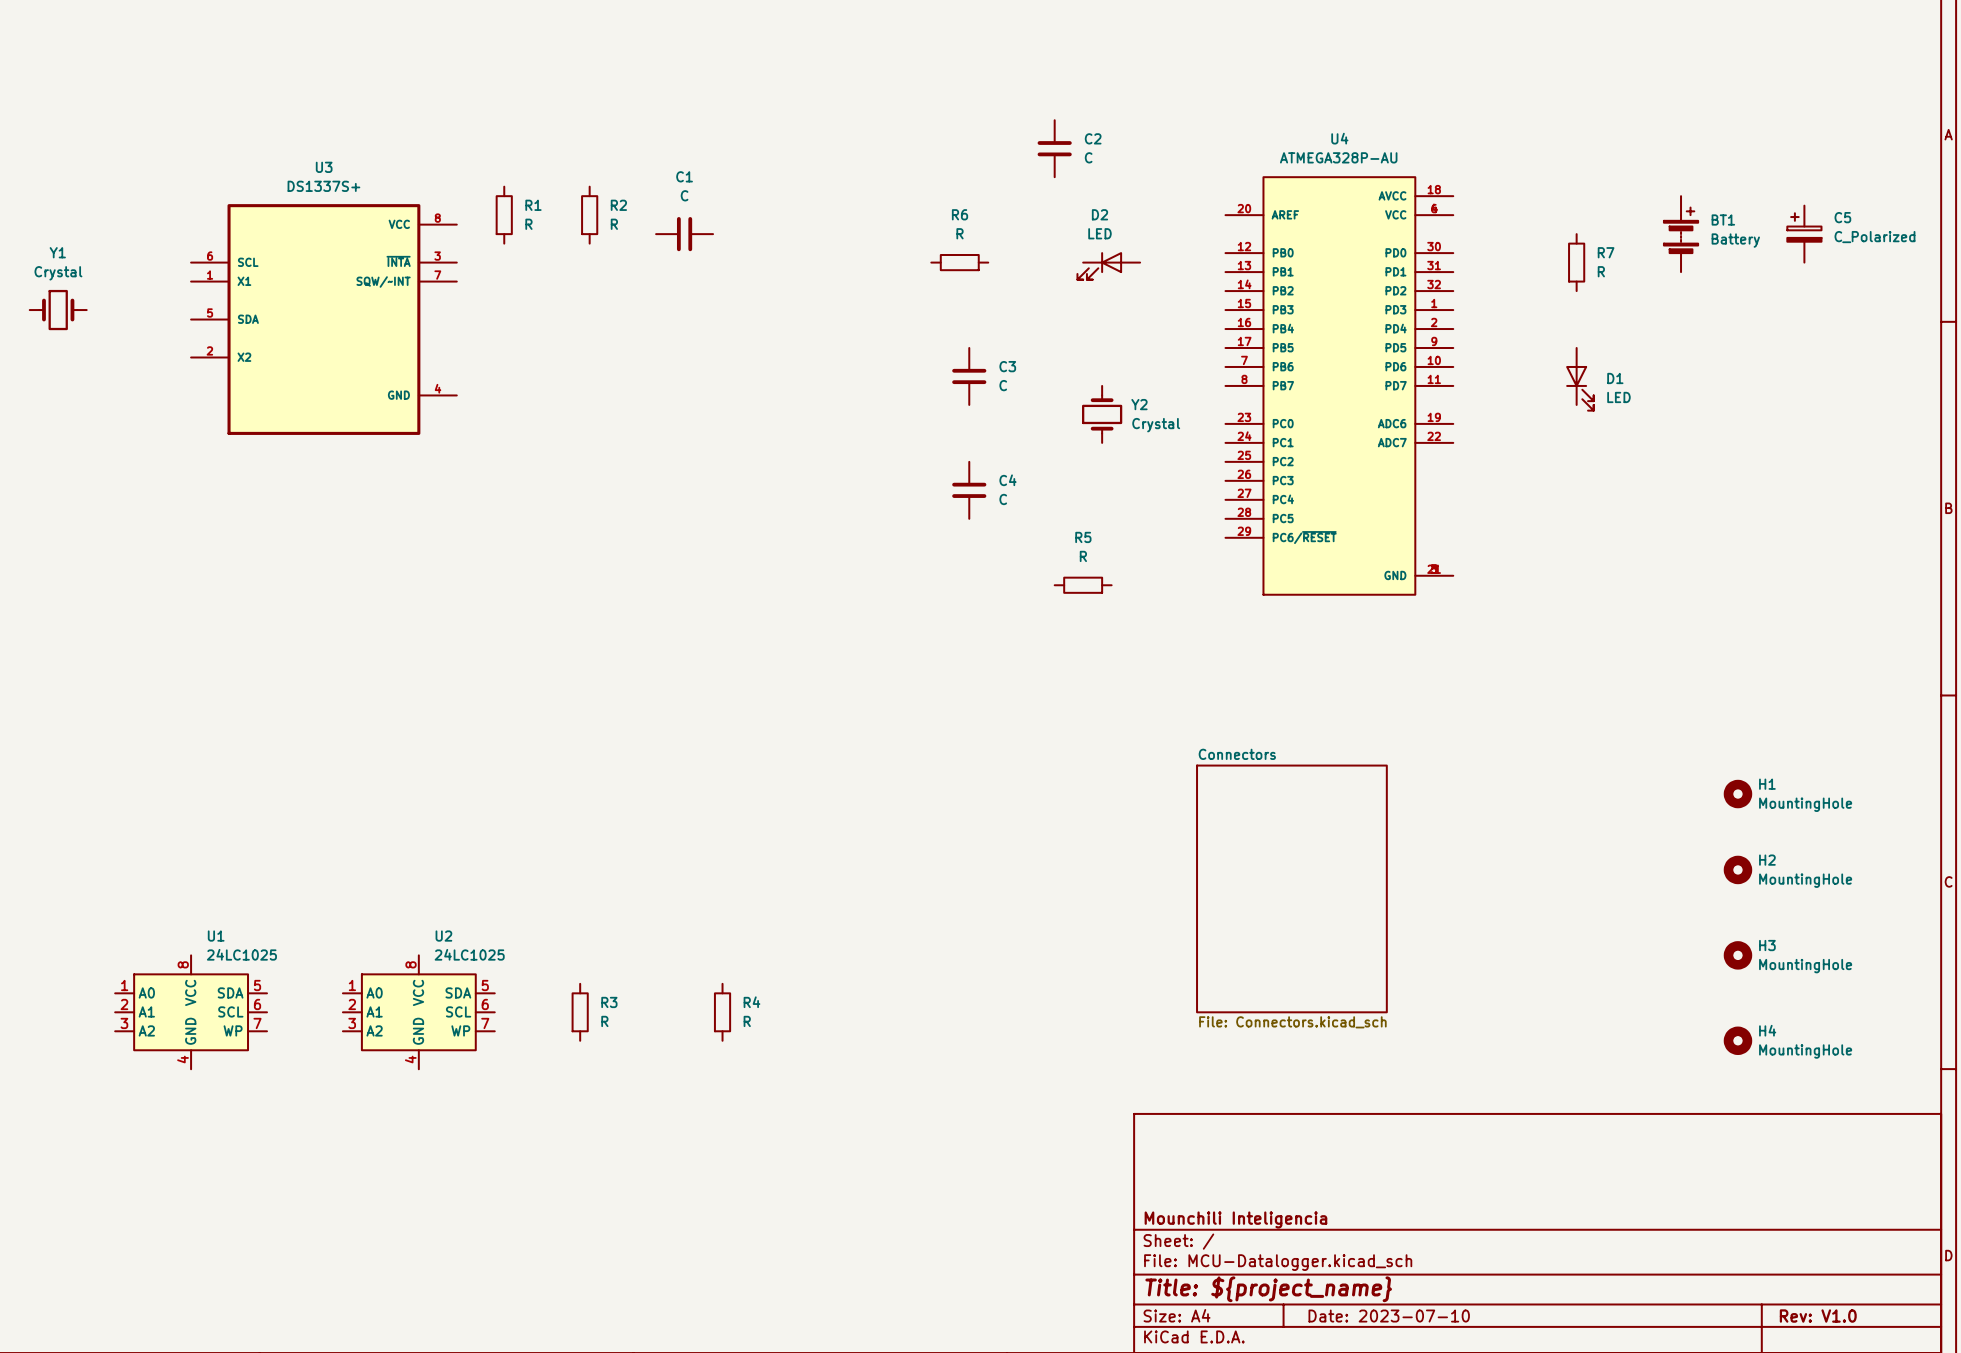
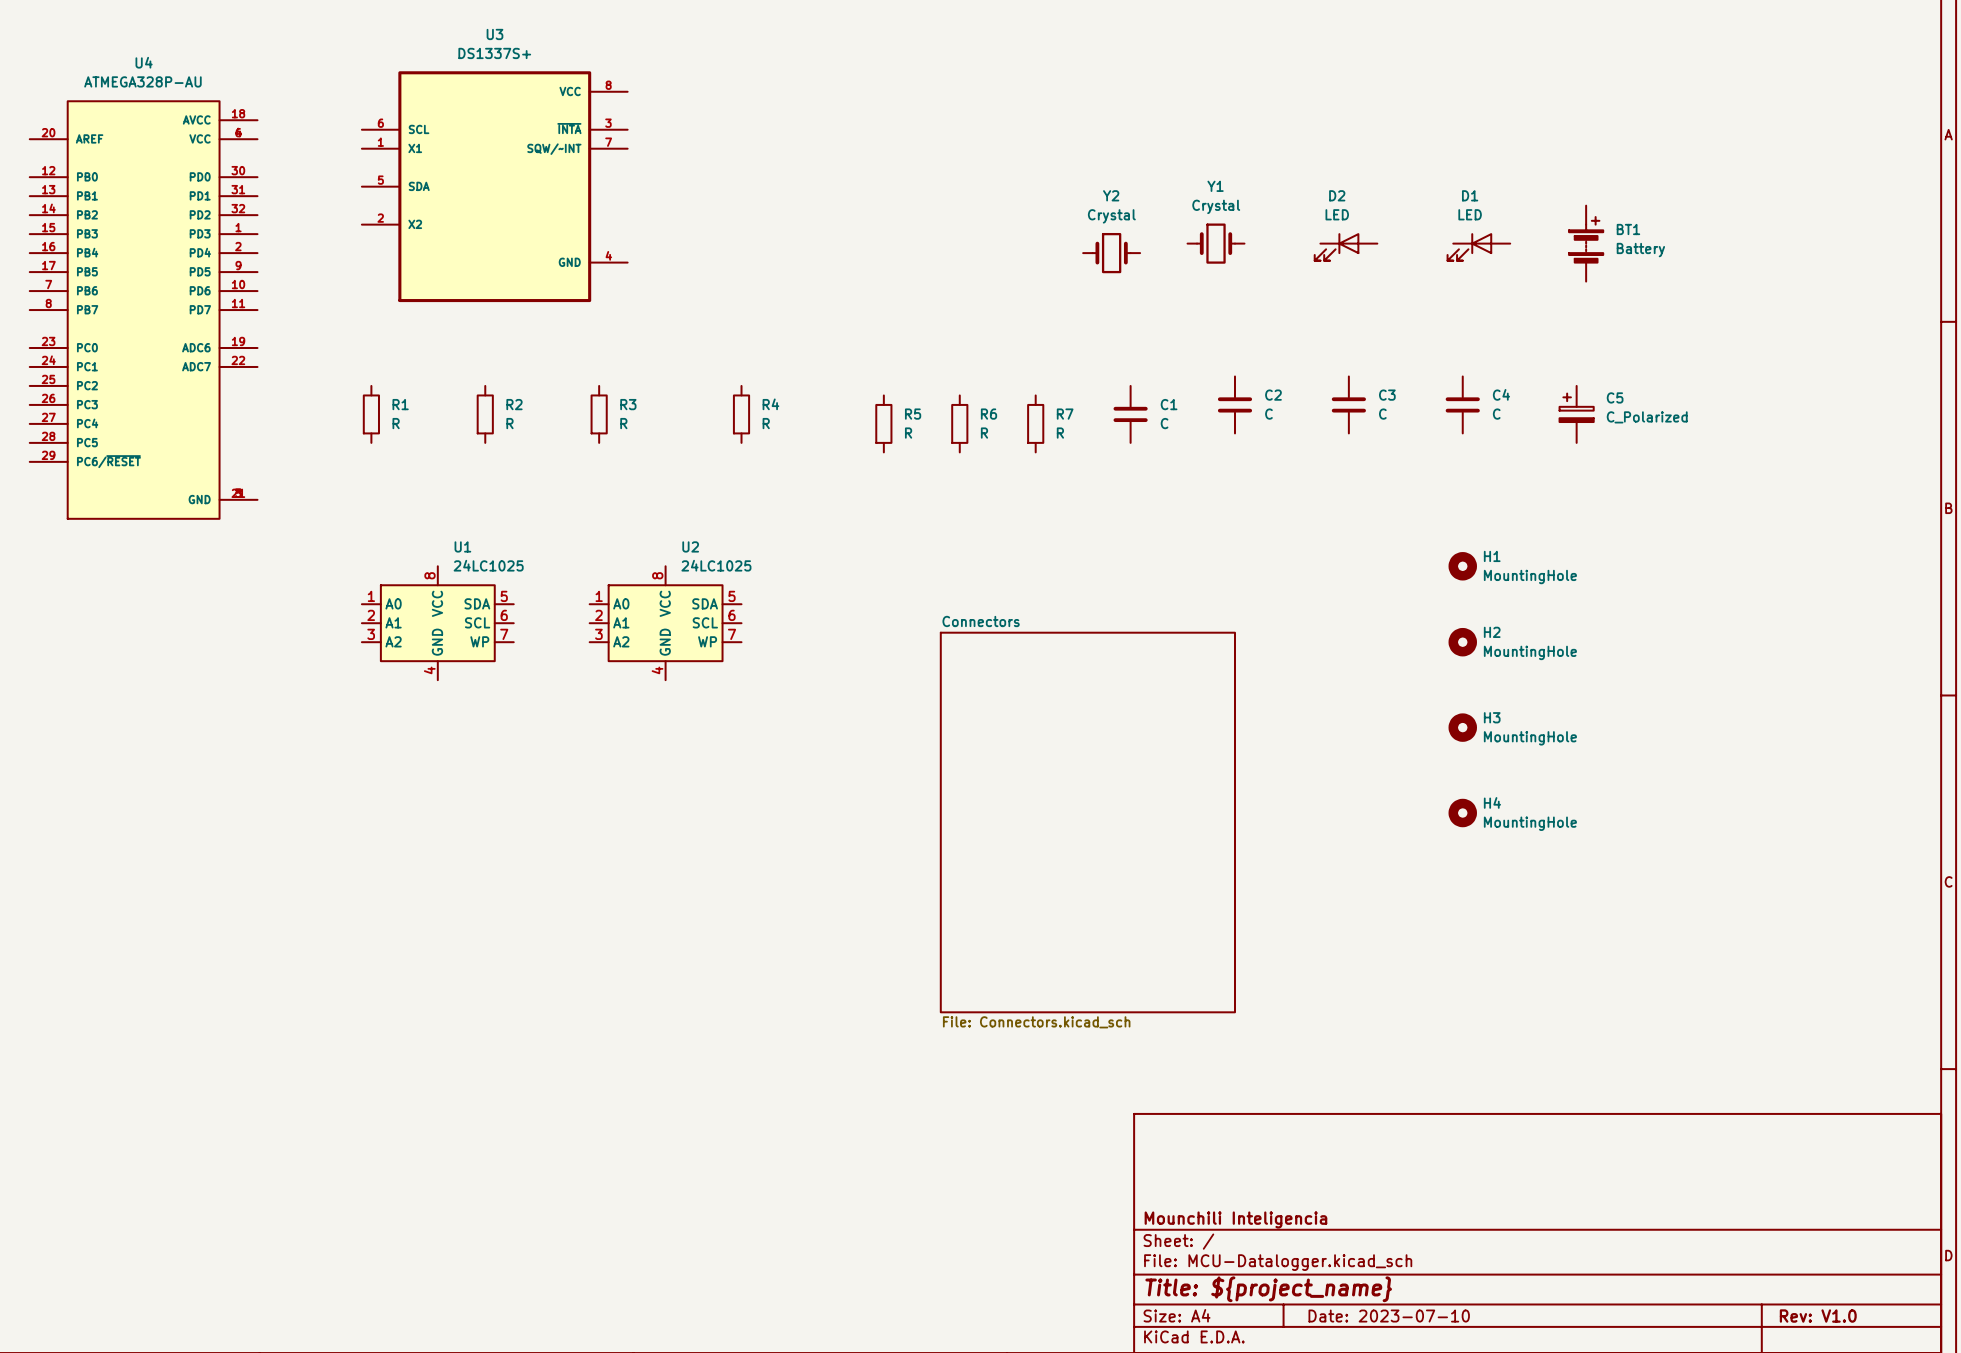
C2 position: (1054, 148) -> (1234, 404)
C1 name position: C1 (684, 176) -> C1 (1169, 404)
R6 name position: R6 (960, 214) -> R6 (989, 414)
R1 position: (504, 215) -> (371, 414)
R2 position: (589, 215) -> (485, 414)
C1 rotation: 0° (684, 234) -> 90° clockwise (1130, 414)
C1 position: (684, 234) -> (1130, 414)
BT1 position: (1681, 234) -> (1586, 243)
C5 position: (1804, 234) -> (1576, 414)
R6 rotation: 0° (959, 262) -> 90° clockwise (959, 423)
R6 position: (959, 262) -> (959, 423)
R7 position: (1576, 262) -> (1035, 423)
D2 position: (1108, 265) -> (1346, 246)
Y1 position: (58, 310) -> (1216, 243)
U3 position: (323, 319) -> (494, 186)
C3 position: (969, 376) -> (1348, 404)
D1 name position: D1 (1615, 378) -> D1 (1470, 195)
D1 position: (1579, 379) -> (1478, 246)
U4 position: (1339, 385) -> (143, 310)
D1 rotation: 0° (1579, 388) -> 90° clockwise (1469, 246)
D1 value position: LED (1618, 397) -> LED (1470, 214)
Y2 name position: Y2 (1139, 404) -> Y2 (1111, 195)
Y2 rotation: 0° (1102, 414) -> 90° clockwise (1111, 253)
Y2 position: (1102, 414) -> (1111, 253)
Y2 value position: Crystal (1156, 425) -> Crystal (1111, 216)
C4 position: (969, 490) -> (1462, 404)
R5 name position: R5 (1083, 537) -> R5 (913, 414)
R5 rotation: 0° (1083, 585) -> 90° clockwise (883, 423)
R5 position: (1083, 585) -> (883, 423)
H1 position: (1737, 794) -> (1462, 566)
sheet Connectors: none -> File: Connectors.kicad_sch (1087, 822)
H2 position: (1737, 869) -> (1462, 642)
sheet Connectors: File: Connectors.kicad_sch (1291, 888) -> none
H3 position: (1737, 955) -> (1462, 727)
U1 position: (191, 1012) -> (437, 623)
U2 position: (418, 1012) -> (665, 623)
R3 position: (580, 1012) -> (599, 414)
R4 position: (722, 1012) -> (741, 414)
H4 position: (1737, 1040) -> (1462, 813)

